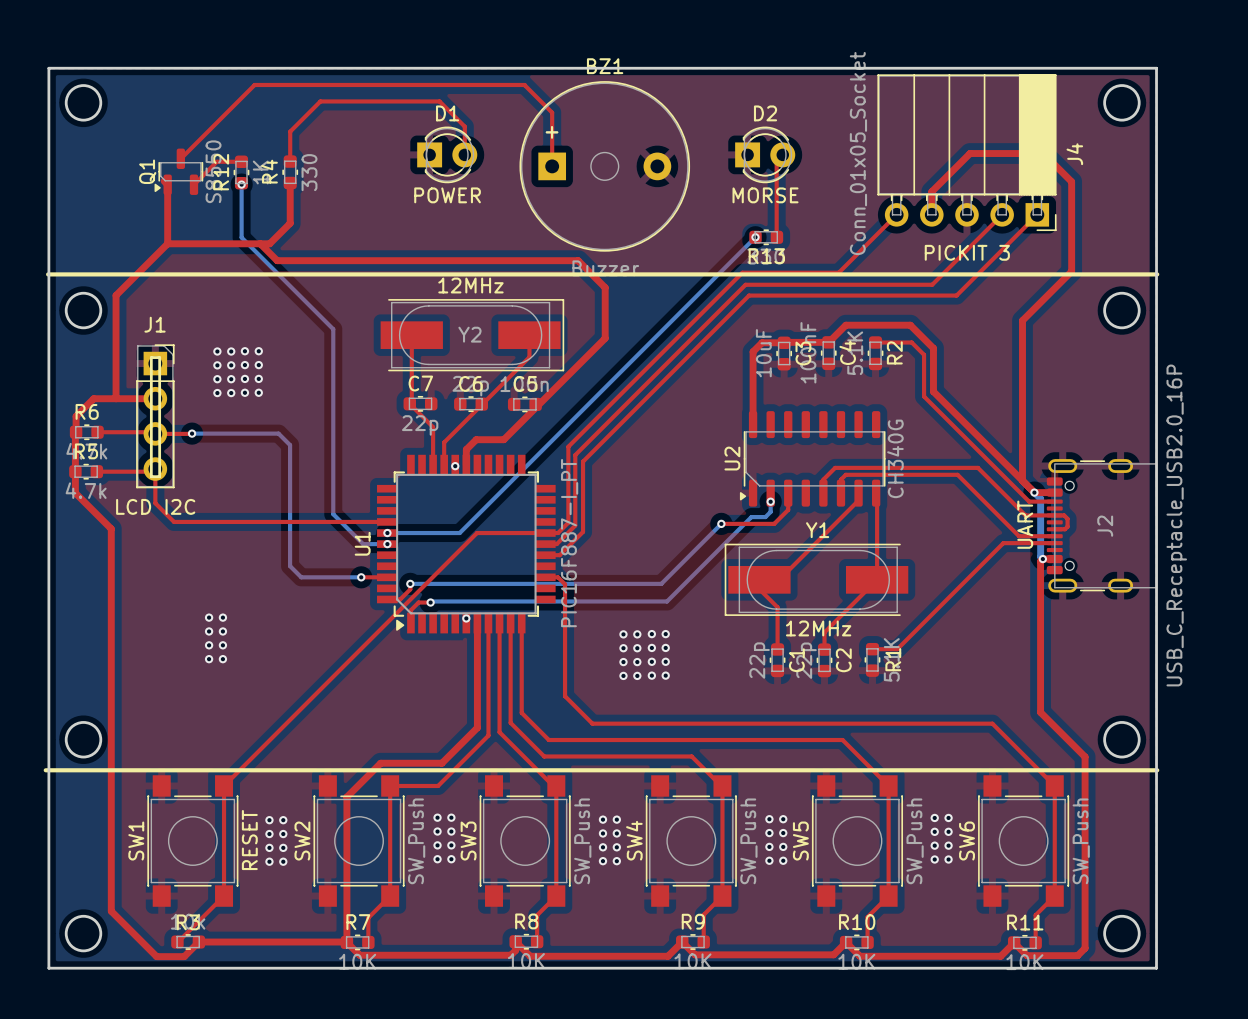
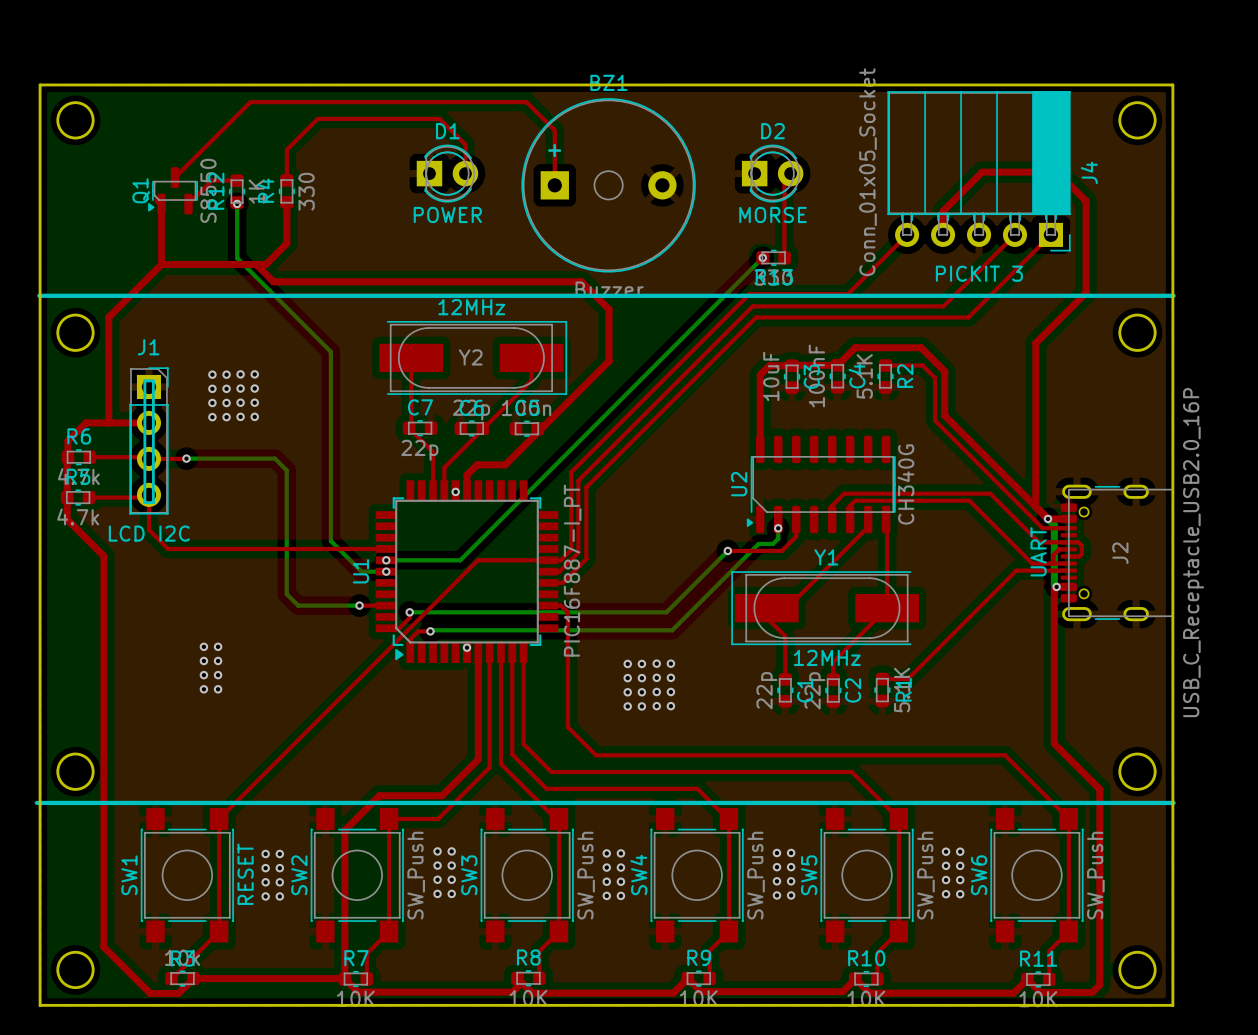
top track: none -> (1068, 549) (1059, 549) (1053, 555) (1053, 563)

